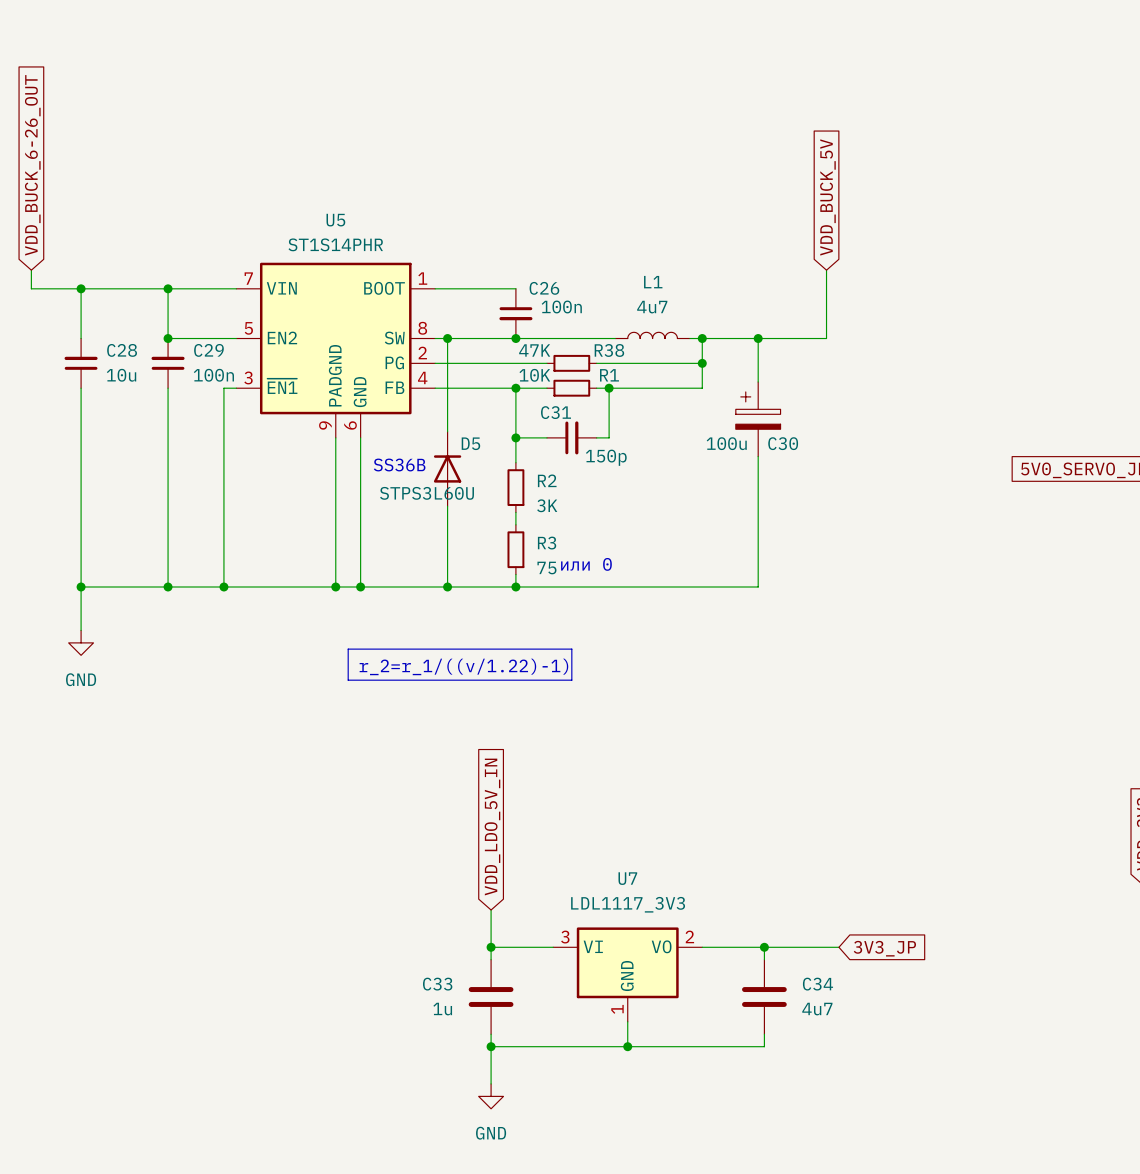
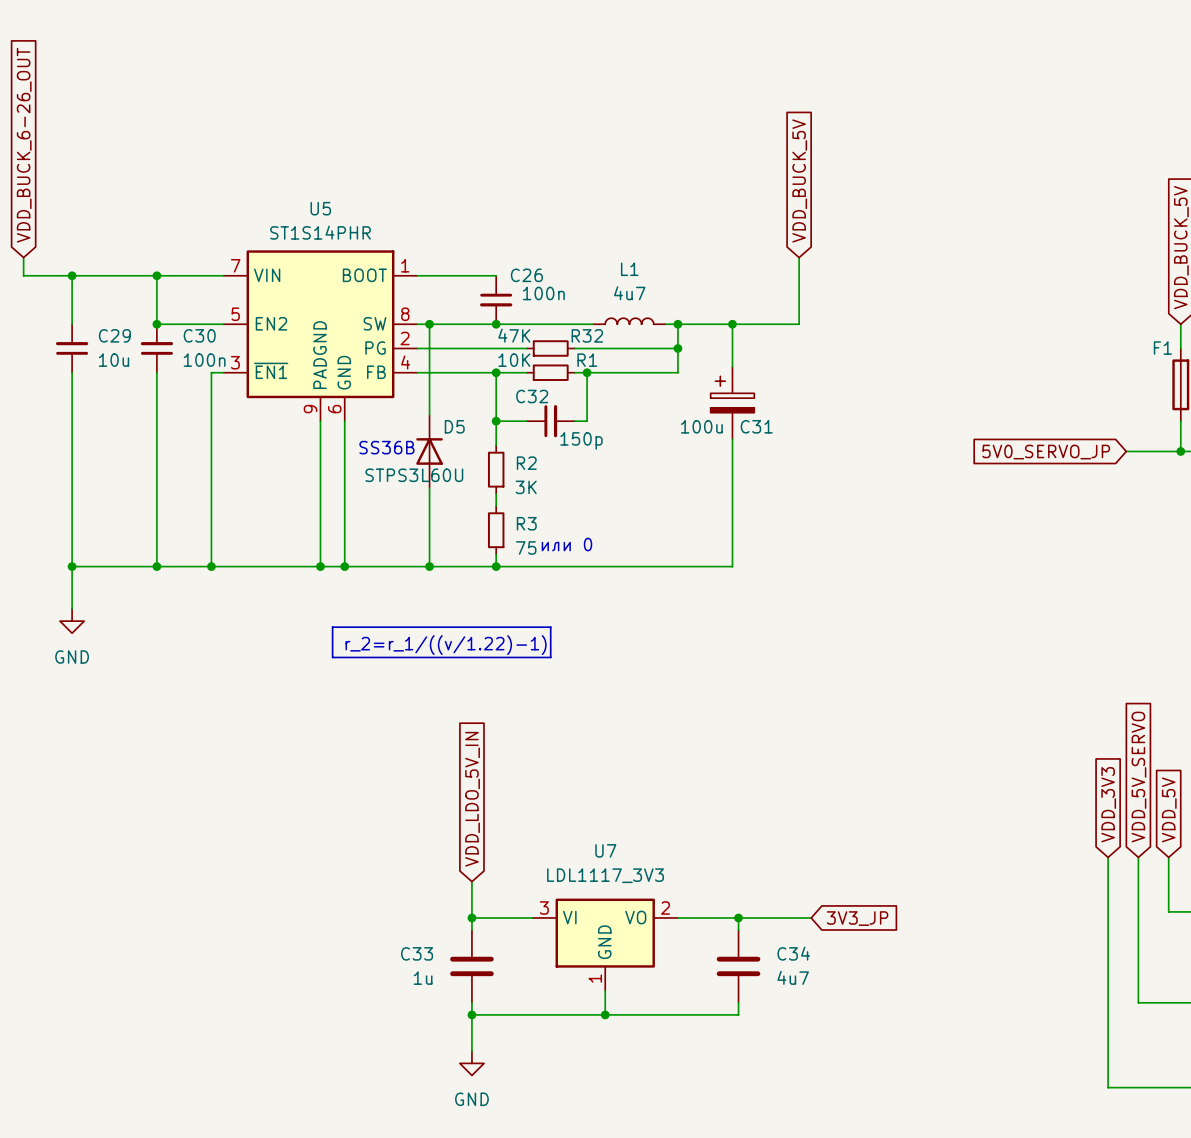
C28 name: C28 (122, 350) -> C29 (114, 335)
C29 name: C29 (208, 350) -> C30 (199, 335)
R38 name: R38 (609, 350) -> R32 (587, 335)
C31 name: C31 (556, 412) -> C32 (532, 396)
C30 name: C30 (783, 443) -> C31 (756, 426)

